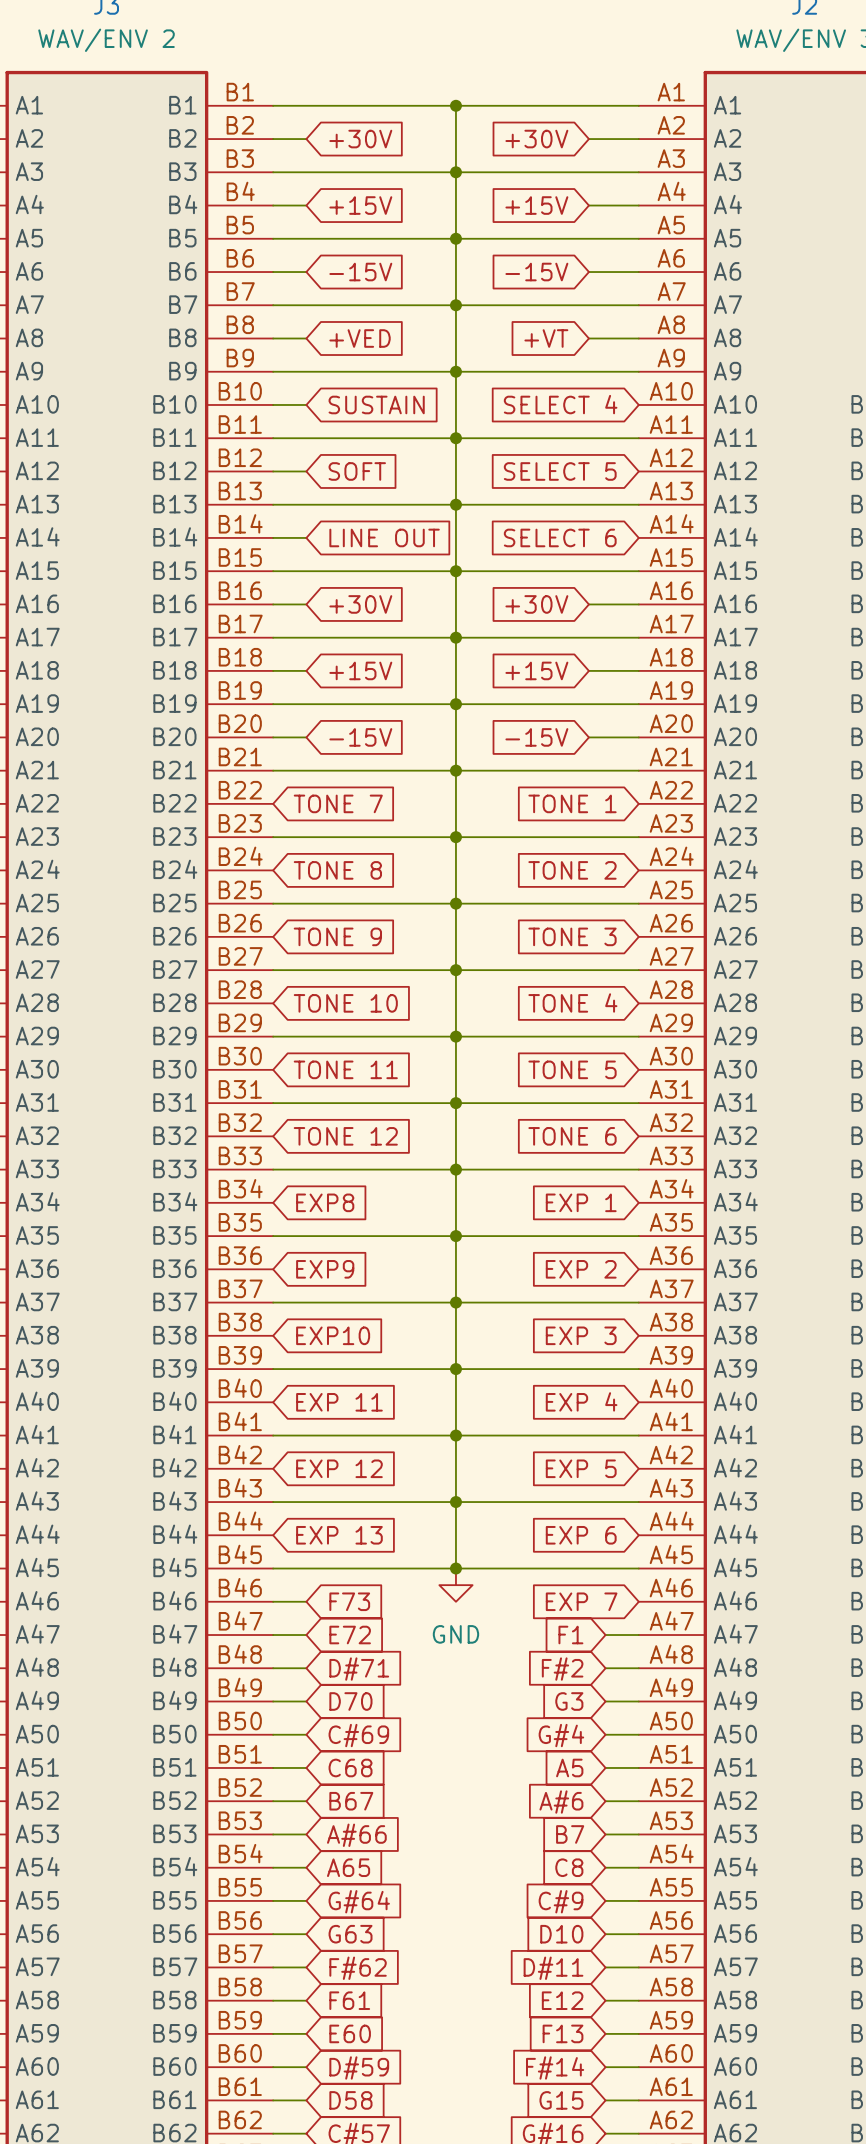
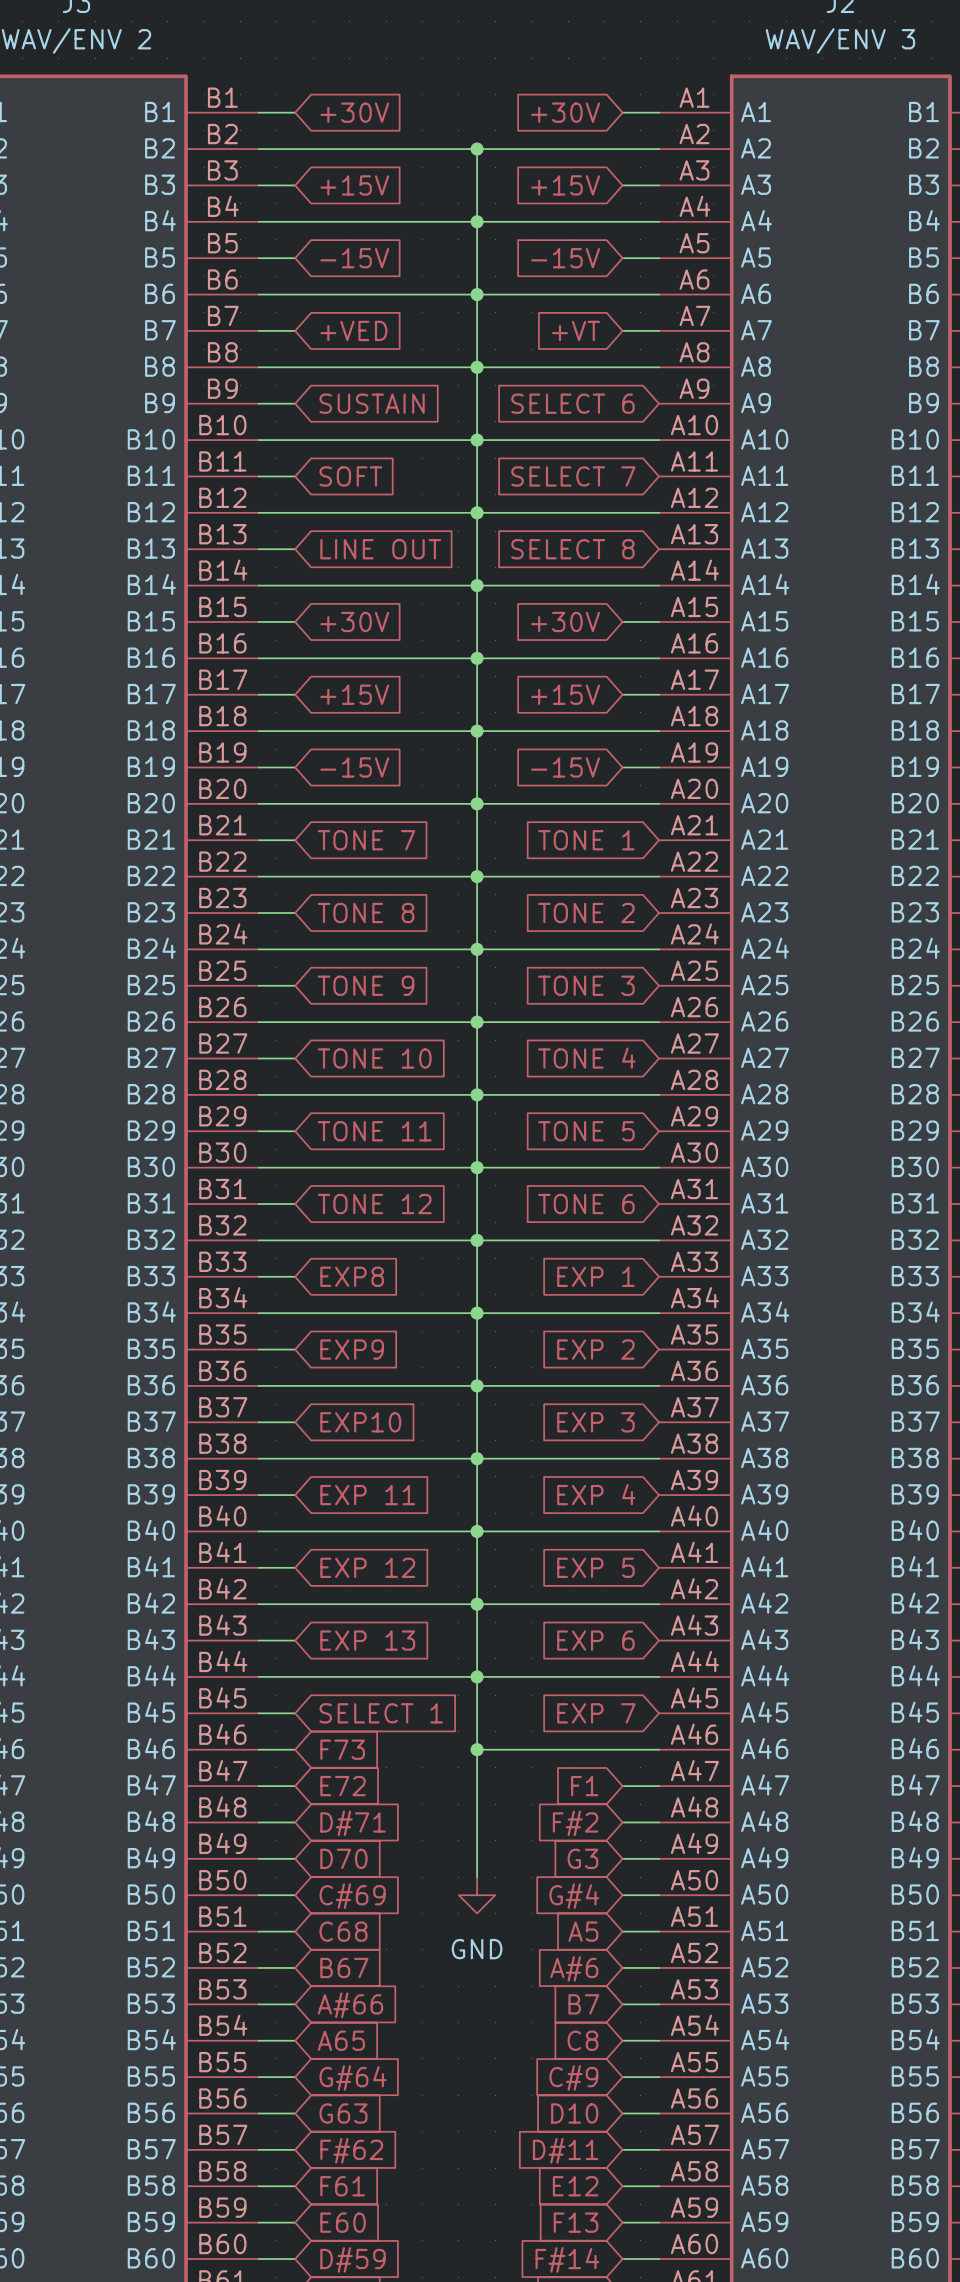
wire: (306, 105) (605, 105) -> none
wire: (455, 105) (455, 1568) -> none
junction: (455, 105) -> none
wire: none -> (295, 149) (604, 149)
global label position: +30V (360, 139) -> +30V (354, 112)
wire: none -> (477, 149) (477, 1877)
junction: none -> (477, 149)
global label position: +30V (536, 139) -> +30V (565, 112)
wire: (306, 172) (605, 172) -> none
junction: (455, 172) -> none
wire: none -> (295, 221) (604, 221)
global label position: +15V (360, 205) -> +15V (354, 185)
junction: none -> (477, 221)
global label position: +15V (536, 205) -> +15V (565, 185)
wire: (306, 238) (605, 238) -> none
junction: (455, 238) -> none
wire: none -> (295, 294) (604, 294)
global label position: -15V (360, 272) -> -15V (354, 258)
junction: none -> (477, 294)
global label position: -15V (536, 272) -> -15V (565, 258)
wire: (306, 305) (605, 305) -> none
junction: (455, 305) -> none
wire: none -> (295, 367) (604, 367)
global label position: +VED (360, 338) -> +VED (353, 330)
junction: none -> (477, 367)
global label position: +VT (546, 338) -> +VT (576, 330)
wire: (306, 371) (638, 371) -> (295, 440) (658, 440)
junction: (455, 371) -> none
global label position: SUSTAIN (376, 404) -> SUSTAIN (372, 403)
junction: none -> (477, 440)
global label: SELECT 4 (560, 404) -> none
wire: (306, 438) (638, 438) -> (295, 512) (658, 512)
junction: (455, 438) -> none
global label: none -> SELECT 7 (573, 476)
global label position: SOFT (357, 471) -> SOFT (350, 476)
junction: none -> (477, 512)
global label: SELECT 5 (560, 471) -> none
wire: (306, 504) (638, 504) -> (295, 585) (658, 585)
junction: (455, 504) -> none
global label: none -> SELECT 8 (572, 549)
global label position: LINE OUT (384, 537) -> LINE OUT (380, 549)
junction: none -> (477, 585)
global label position: SELECT 6 (560, 537) -> SELECT 6 (572, 403)
wire: (306, 571) (605, 571) -> none
junction: (455, 571) -> none
wire: none -> (295, 658) (604, 658)
global label position: +30V (360, 604) -> +30V (354, 621)
junction: none -> (477, 658)
global label position: +30V (536, 604) -> +30V (565, 621)
wire: (306, 637) (605, 637) -> none
junction: (455, 637) -> none
wire: none -> (295, 731) (604, 731)
global label position: +15V (360, 670) -> +15V (354, 694)
junction: none -> (477, 731)
global label position: +15V (536, 670) -> +15V (565, 694)
wire: (306, 704) (605, 704) -> none
junction: (455, 704) -> none
wire: none -> (295, 803) (604, 803)
global label position: -15V (360, 737) -> -15V (354, 767)
junction: none -> (477, 803)
global label position: -15V (536, 737) -> -15V (565, 767)
wire: (306, 770) (638, 770) -> none
junction: (455, 770) -> none
wire: none -> (258, 876) (658, 876)
global label position: TONE 7 (338, 803) -> TONE 7 (366, 840)
junction: none -> (477, 876)
global label position: TONE 1 (572, 803) -> TONE 1 (586, 840)
wire: (306, 837) (638, 837) -> none
junction: (455, 837) -> none
wire: none -> (258, 949) (658, 949)
global label position: TONE 8 (337, 870) -> TONE 8 (366, 913)
junction: none -> (477, 949)
global label position: TONE 2 (572, 870) -> TONE 2 (586, 913)
wire: (306, 903) (638, 903) -> none
junction: (455, 903) -> none
wire: none -> (258, 1022) (658, 1022)
global label position: TONE 9 (337, 936) -> TONE 9 (366, 985)
junction: none -> (477, 1022)
global label position: TONE 3 (572, 936) -> TONE 3 (586, 985)
wire: (306, 970) (638, 970) -> none
junction: (455, 970) -> none
global label position: TONE 4 (572, 1002) -> TONE 4 (586, 1058)
wire: none -> (258, 1094) (658, 1094)
global label position: TONE 10 (345, 1003) -> TONE 10 (374, 1058)
junction: none -> (477, 1094)
wire: (306, 1036) (638, 1036) -> none
junction: (455, 1036) -> none
wire: none -> (258, 1167) (658, 1167)
global label position: TONE 11 (345, 1069) -> TONE 11 (374, 1131)
junction: none -> (477, 1167)
global label position: TONE 5 (572, 1069) -> TONE 5 (586, 1131)
wire: (306, 1103) (638, 1103) -> none
junction: (455, 1103) -> none
wire: none -> (258, 1240) (658, 1240)
global label position: TONE 12 (345, 1136) -> TONE 12 (374, 1204)
junction: none -> (477, 1240)
global label position: TONE 6 (572, 1136) -> TONE 6 (586, 1204)
wire: (306, 1169) (638, 1169) -> none
junction: (455, 1169) -> none
wire: none -> (258, 1313) (658, 1313)
global label position: EXP8 (325, 1202) -> EXP8 (352, 1276)
junction: none -> (477, 1313)
global label position: EXP 1 (581, 1202) -> EXP 1 (595, 1276)
wire: (306, 1236) (638, 1236) -> none
junction: (455, 1236) -> none
wire: none -> (258, 1385) (658, 1385)
global label position: EXP9 (325, 1269) -> EXP9 (352, 1349)
junction: none -> (477, 1385)
global label position: EXP 2 (581, 1269) -> EXP 2 (595, 1349)
wire: (306, 1302) (638, 1302) -> none
junction: (455, 1302) -> none
wire: none -> (258, 1458) (658, 1458)
global label position: EXP10 (333, 1335) -> EXP10 (360, 1422)
junction: none -> (477, 1458)
global label position: EXP 3 (581, 1335) -> EXP 3 (595, 1422)
wire: (306, 1369) (638, 1369) -> none
junction: (455, 1369) -> none
global label position: EXP 4 (581, 1401) -> EXP 4 (596, 1494)
wire: none -> (258, 1531) (658, 1531)
global label position: EXP 11 (339, 1402) -> EXP 11 (367, 1495)
junction: none -> (477, 1531)
wire: (306, 1435) (638, 1435) -> none
junction: (455, 1435) -> none
wire: none -> (258, 1604) (658, 1604)
global label position: EXP 12 (339, 1468) -> EXP 12 (367, 1567)
junction: none -> (477, 1604)
global label position: EXP 5 (581, 1468) -> EXP 5 (595, 1567)
wire: (306, 1502) (638, 1502) -> none
junction: (455, 1502) -> none
wire: none -> (258, 1676) (658, 1676)
global label position: EXP 13 (339, 1535) -> EXP 13 (367, 1640)
junction: none -> (477, 1676)
global label position: EXP 6 (581, 1535) -> EXP 6 (595, 1640)
wire: (306, 1568) (638, 1568) -> none
global label: none -> SELECT 1 (381, 1713)
junction: (455, 1568) -> none
power symbol position: GND (455, 1585) -> GND (477, 1895)
wire: none -> (477, 1749) (658, 1749)
junction: none -> (477, 1749)
global label position: EXP 7 (581, 1601) -> EXP 7 (596, 1713)

